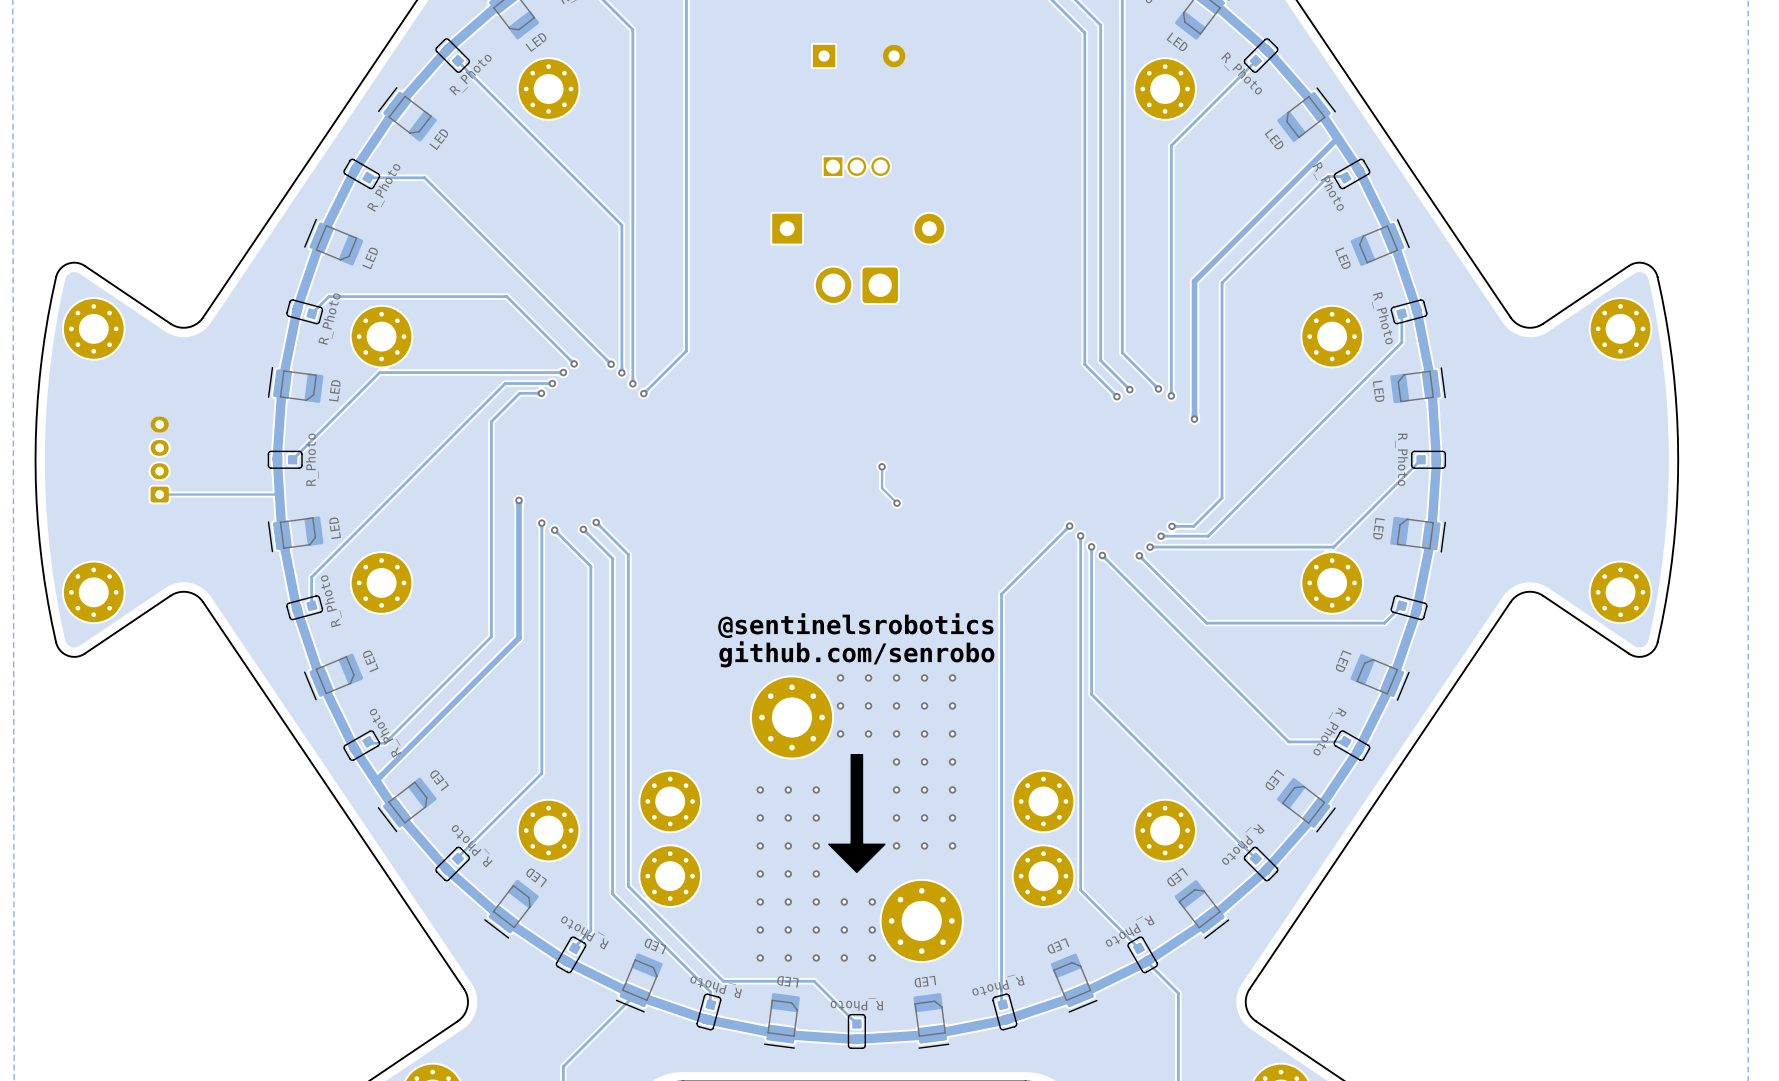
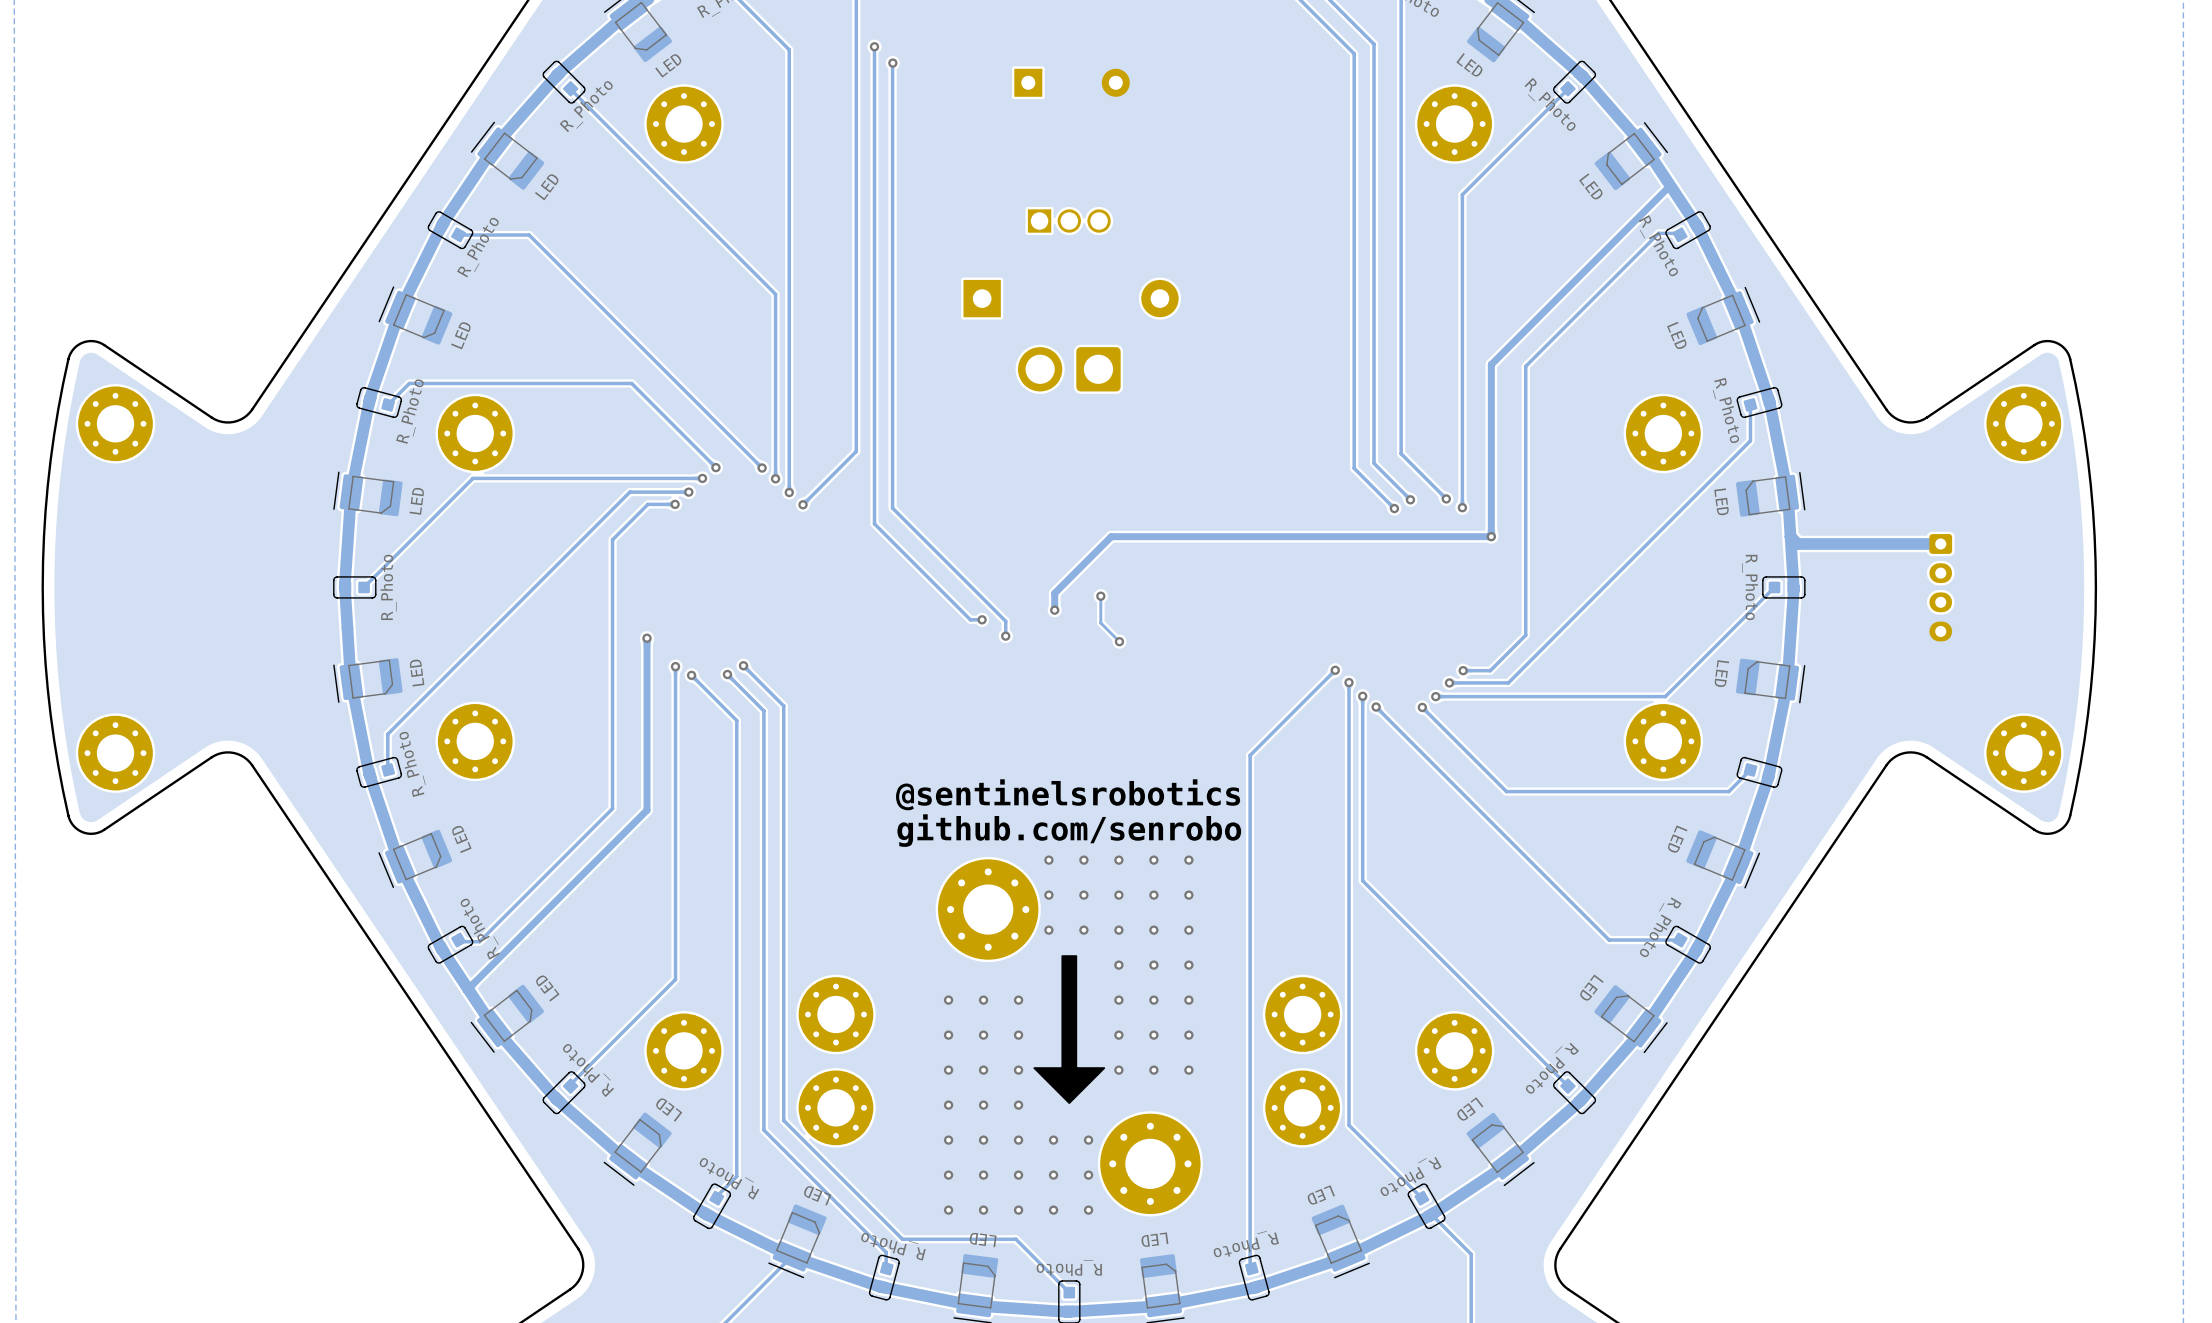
track: none -> (874, 46) (874, 523) (970, 619) (982, 619)
via: none -> (874, 46)
track: none -> (892, 63) (892, 508) (1005, 621) (1005, 636)
via: none -> (892, 63)
track: none -> (1491, 536) (1111, 536) (1054, 593) (1054, 610)
track: none -> (1790, 536) (1797, 543) (1940, 543)
part: (159, 459) -> none
part: none -> (1940, 587)
via: none -> (1054, 610)
via: none -> (982, 619)
track: (279, 492) (277, 494) (159, 494) -> none
via: none -> (1005, 636)

